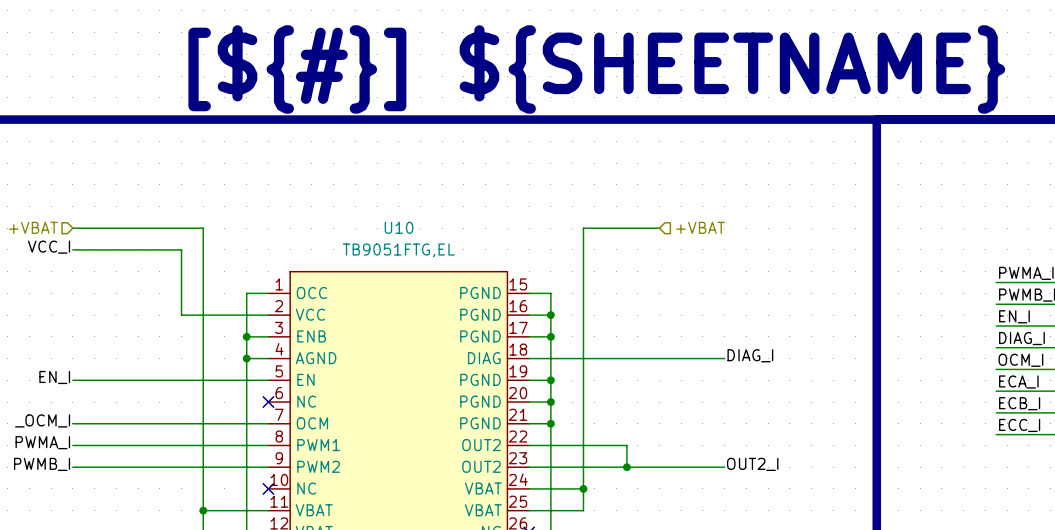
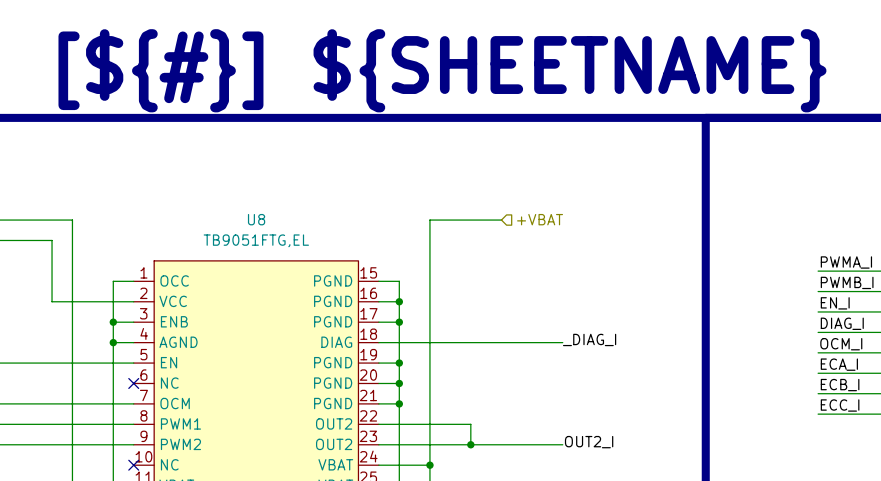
U10 name: U10 (399, 227) -> U8 (256, 219)
label: DIAG_I (750, 355) -> _DIAG_I (589, 339)

